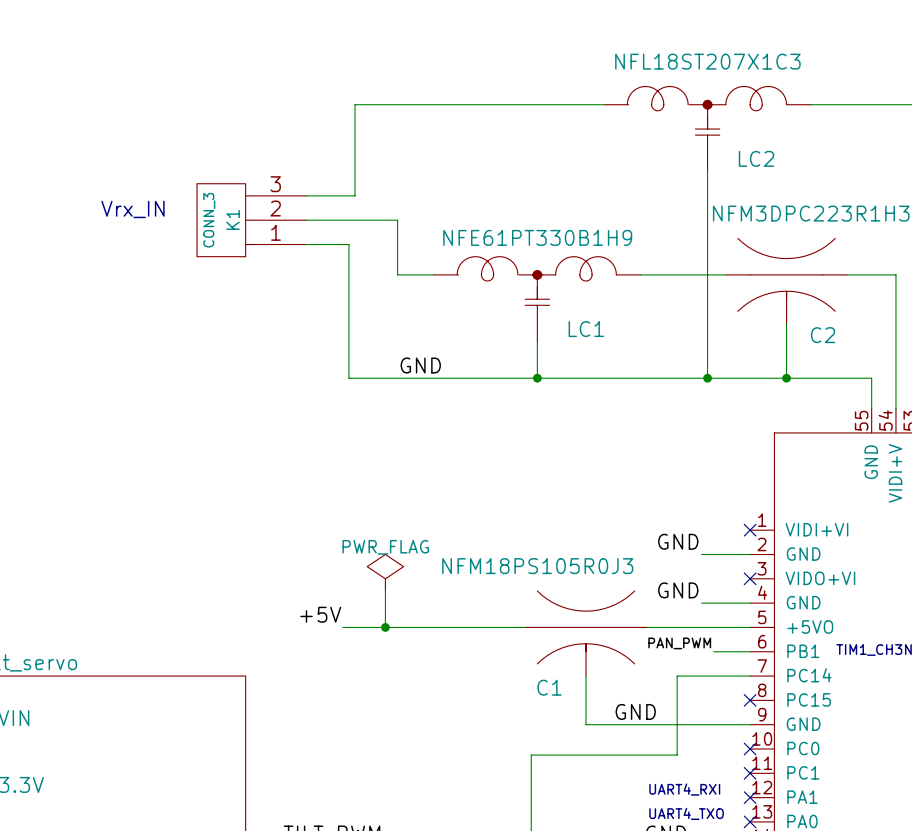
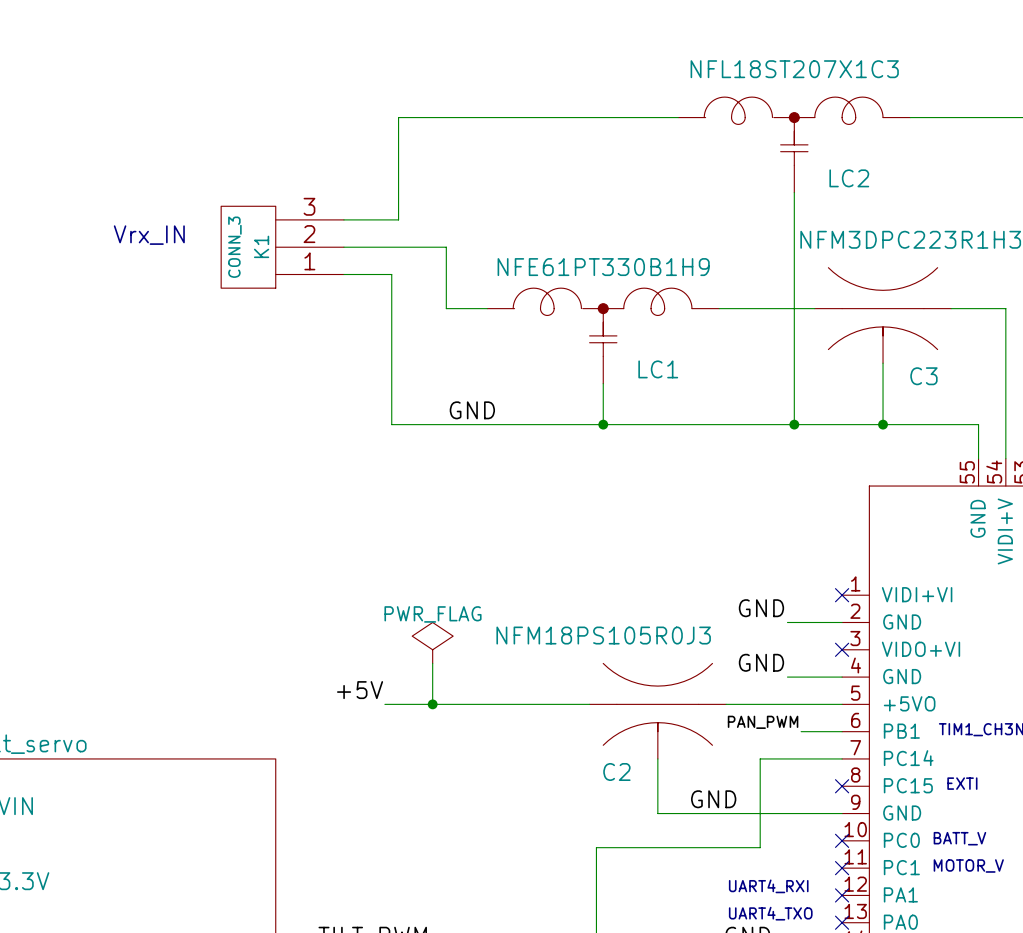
C2 name: C2 (823, 335) -> C3 (923, 376)
C1 name: C1 (549, 687) -> C2 (616, 771)
text: none -> EXTI (962, 783)
text: none -> BATT_V (959, 838)
text: none -> MOTOR_V (968, 865)

